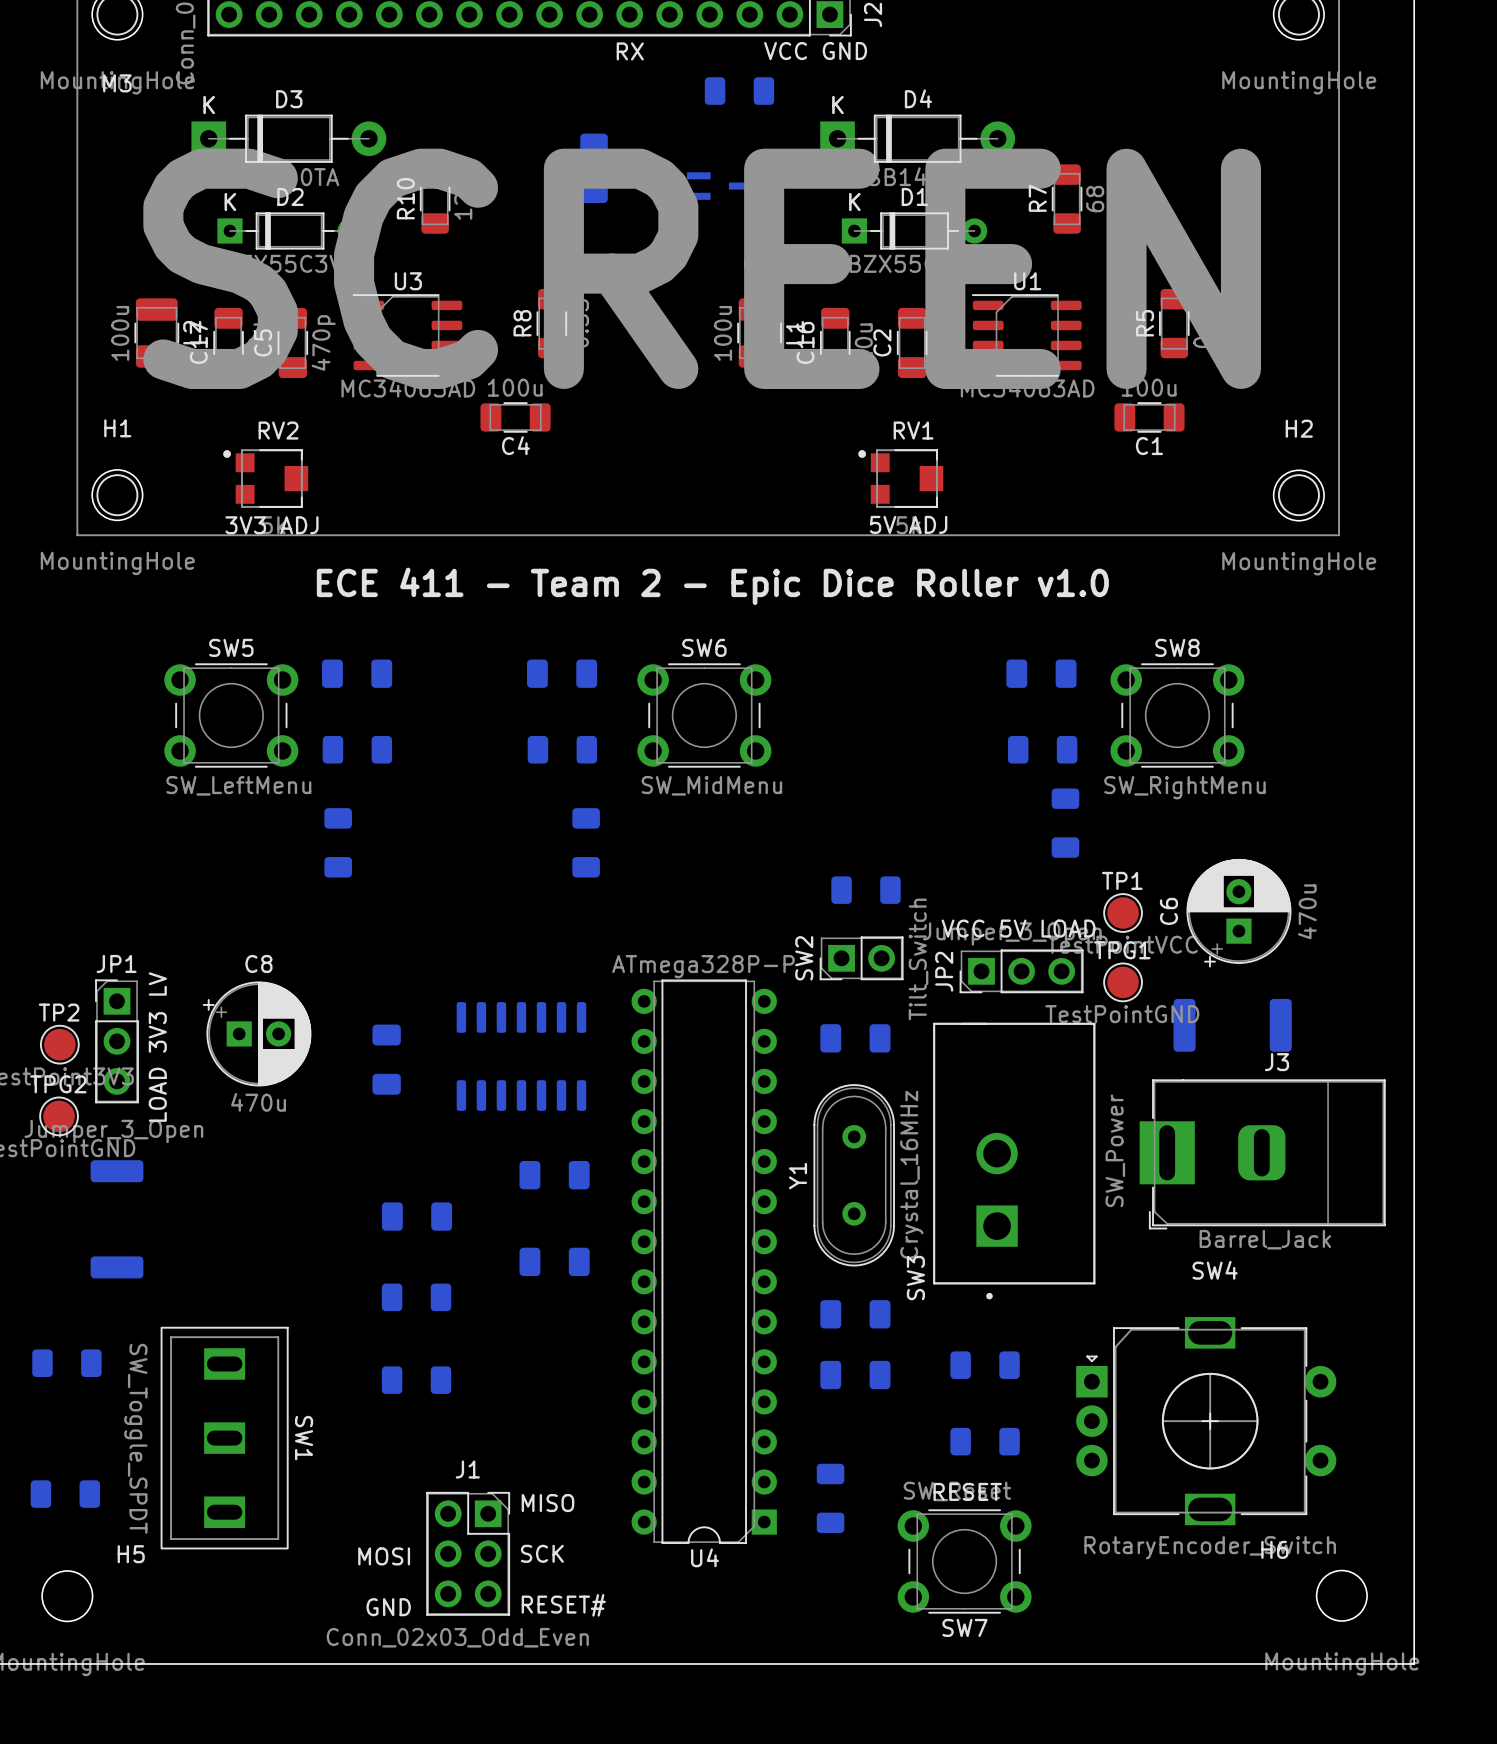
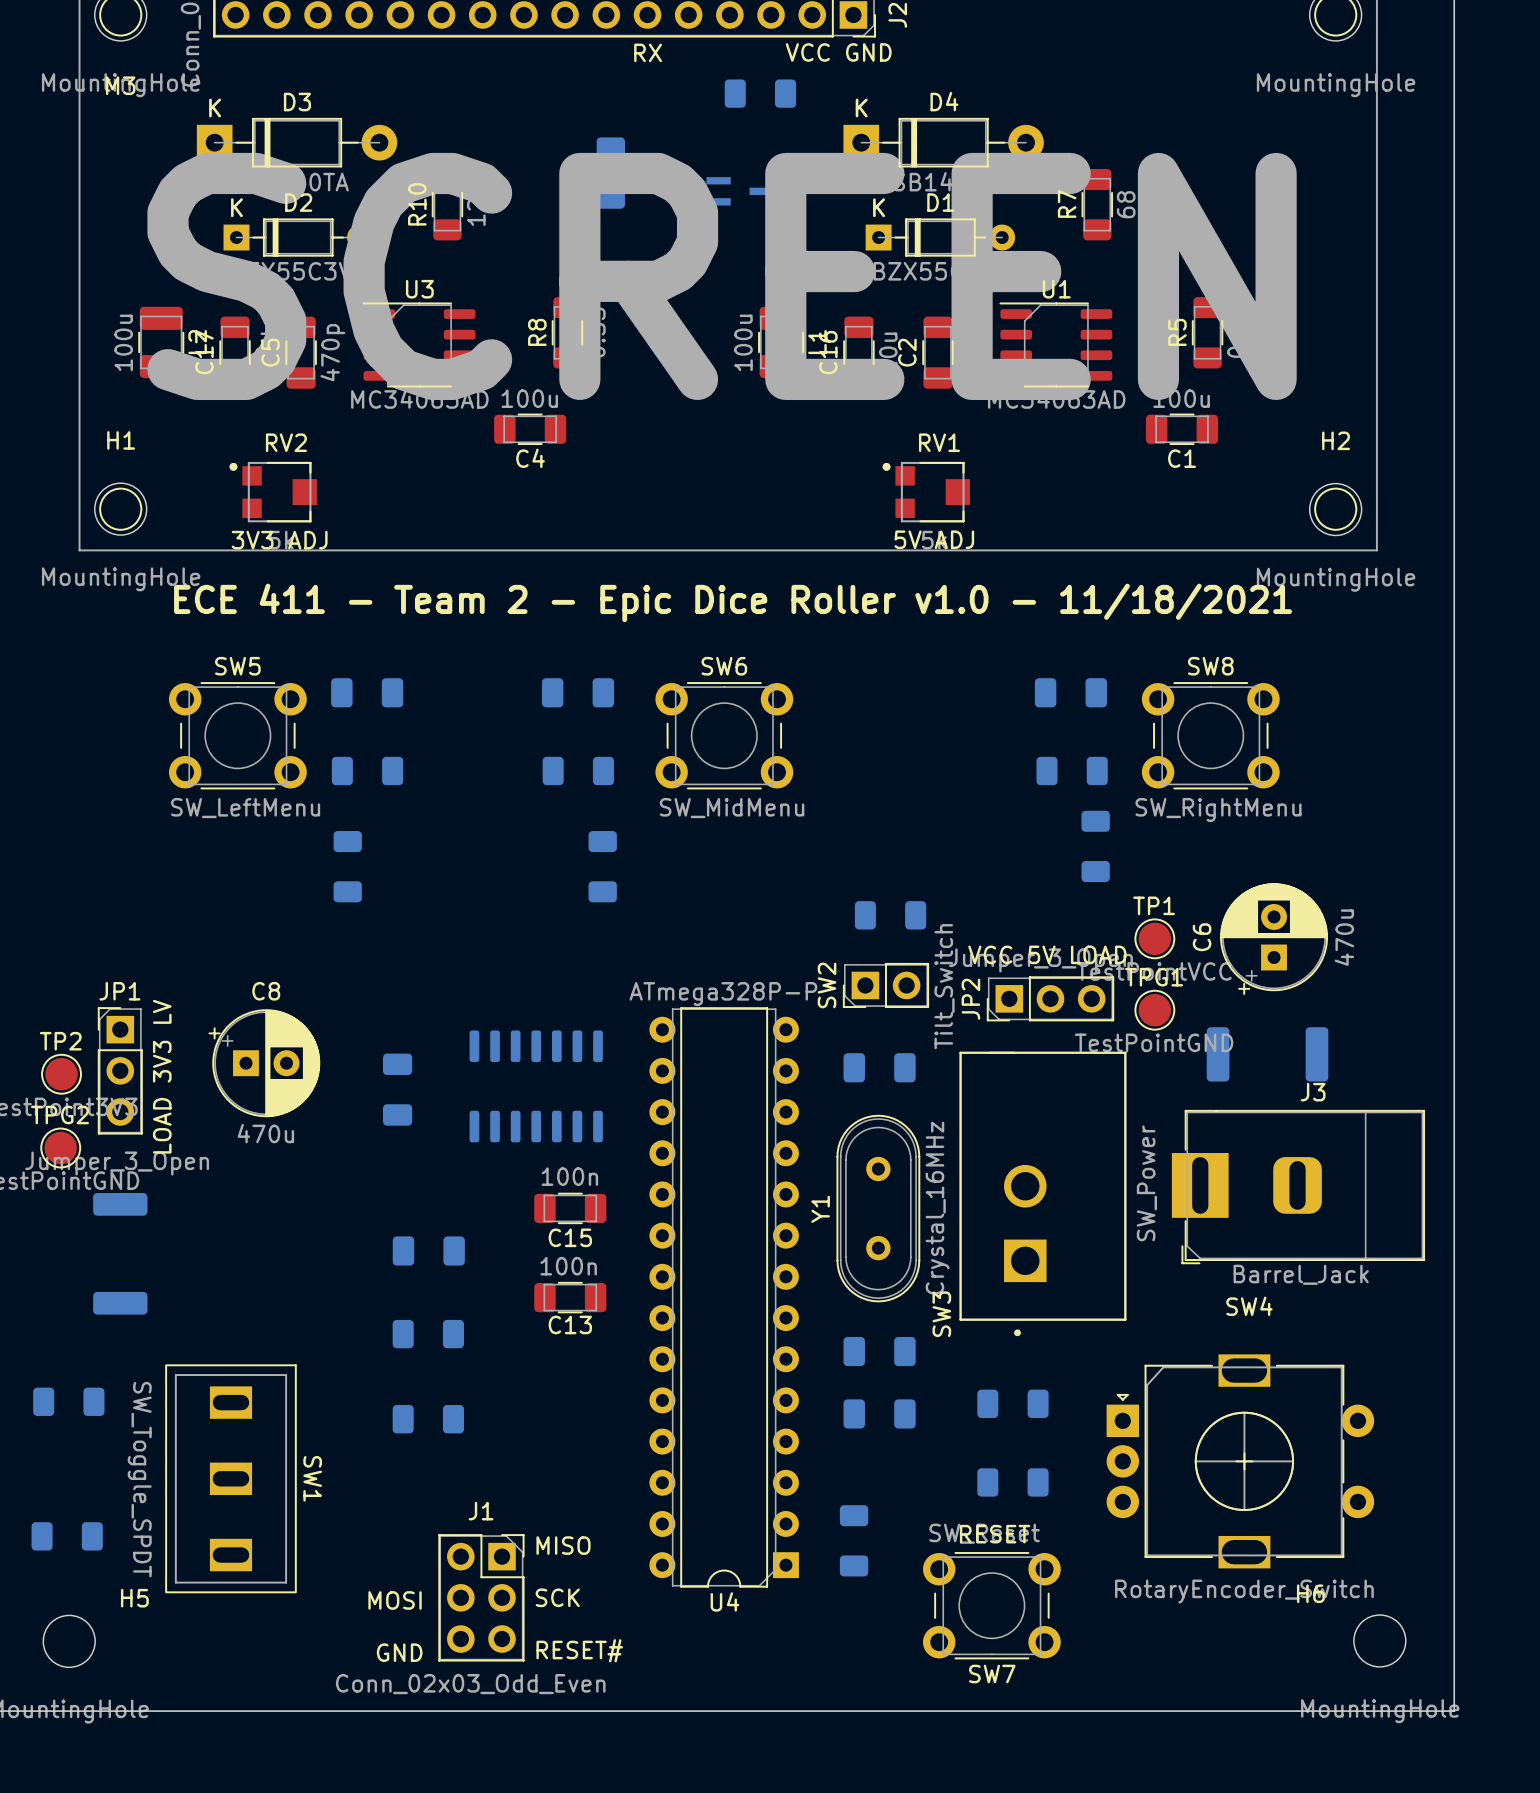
text: ECE 411 - Team 2 - Epic Dice Roller v1.0 (712, 586) -> ECE 411 - Team 2 - Epic Dice Roller v1.0 - 11/18/2021 (733, 602)
C15 side: bottom (554, 1175) -> top (570, 1208)
C13 side: bottom (554, 1261) -> top (570, 1297)

